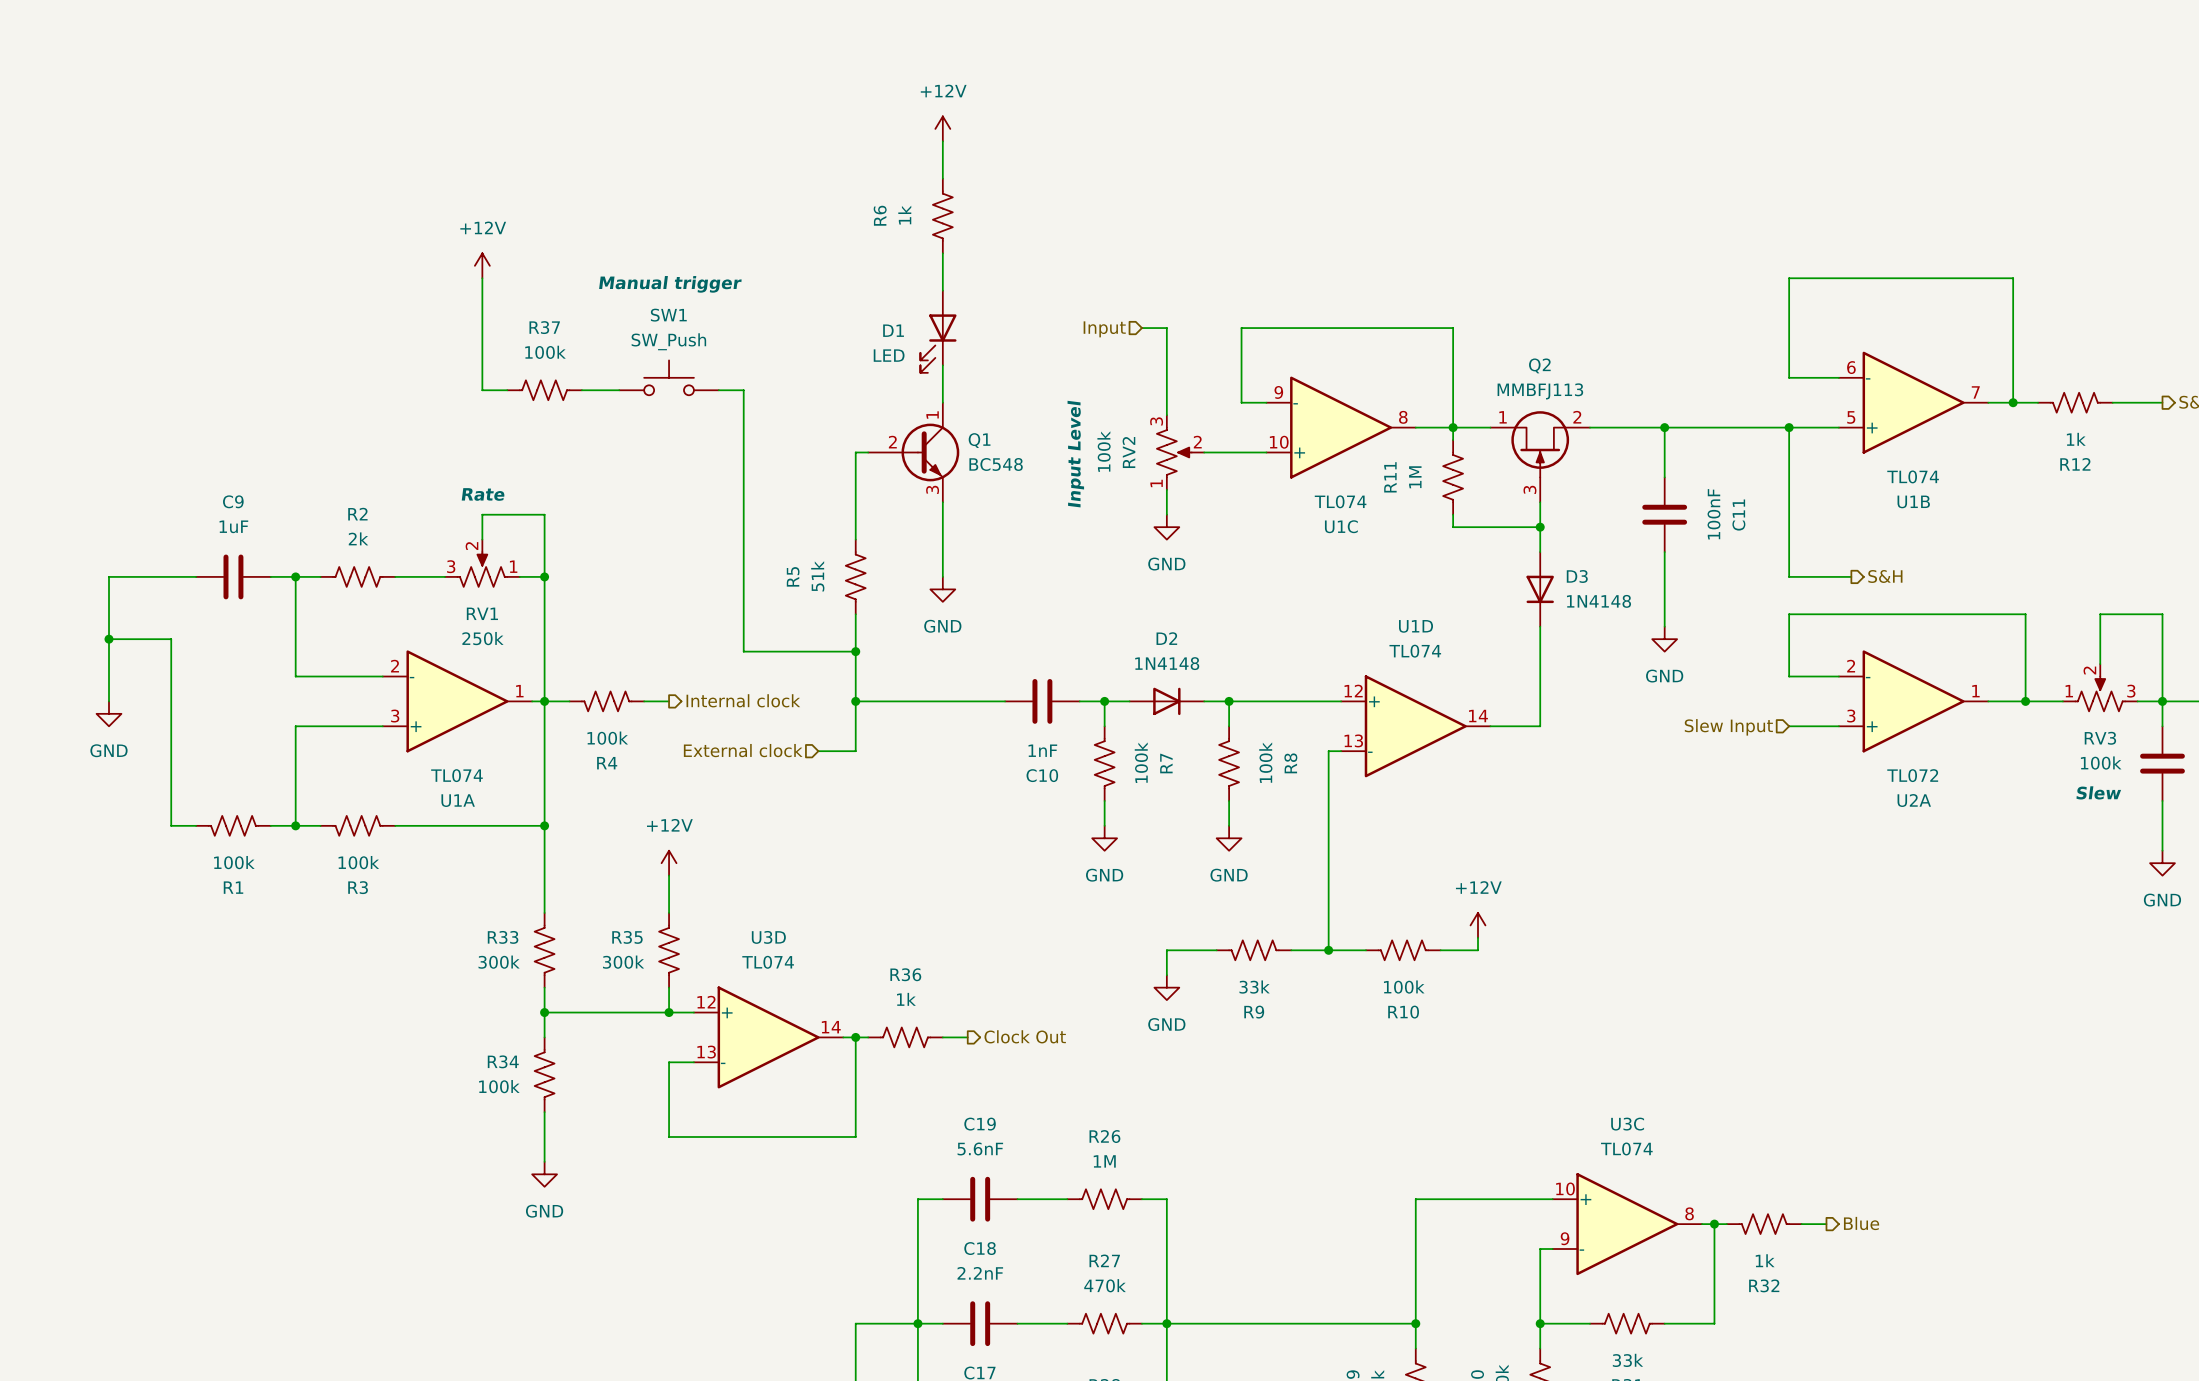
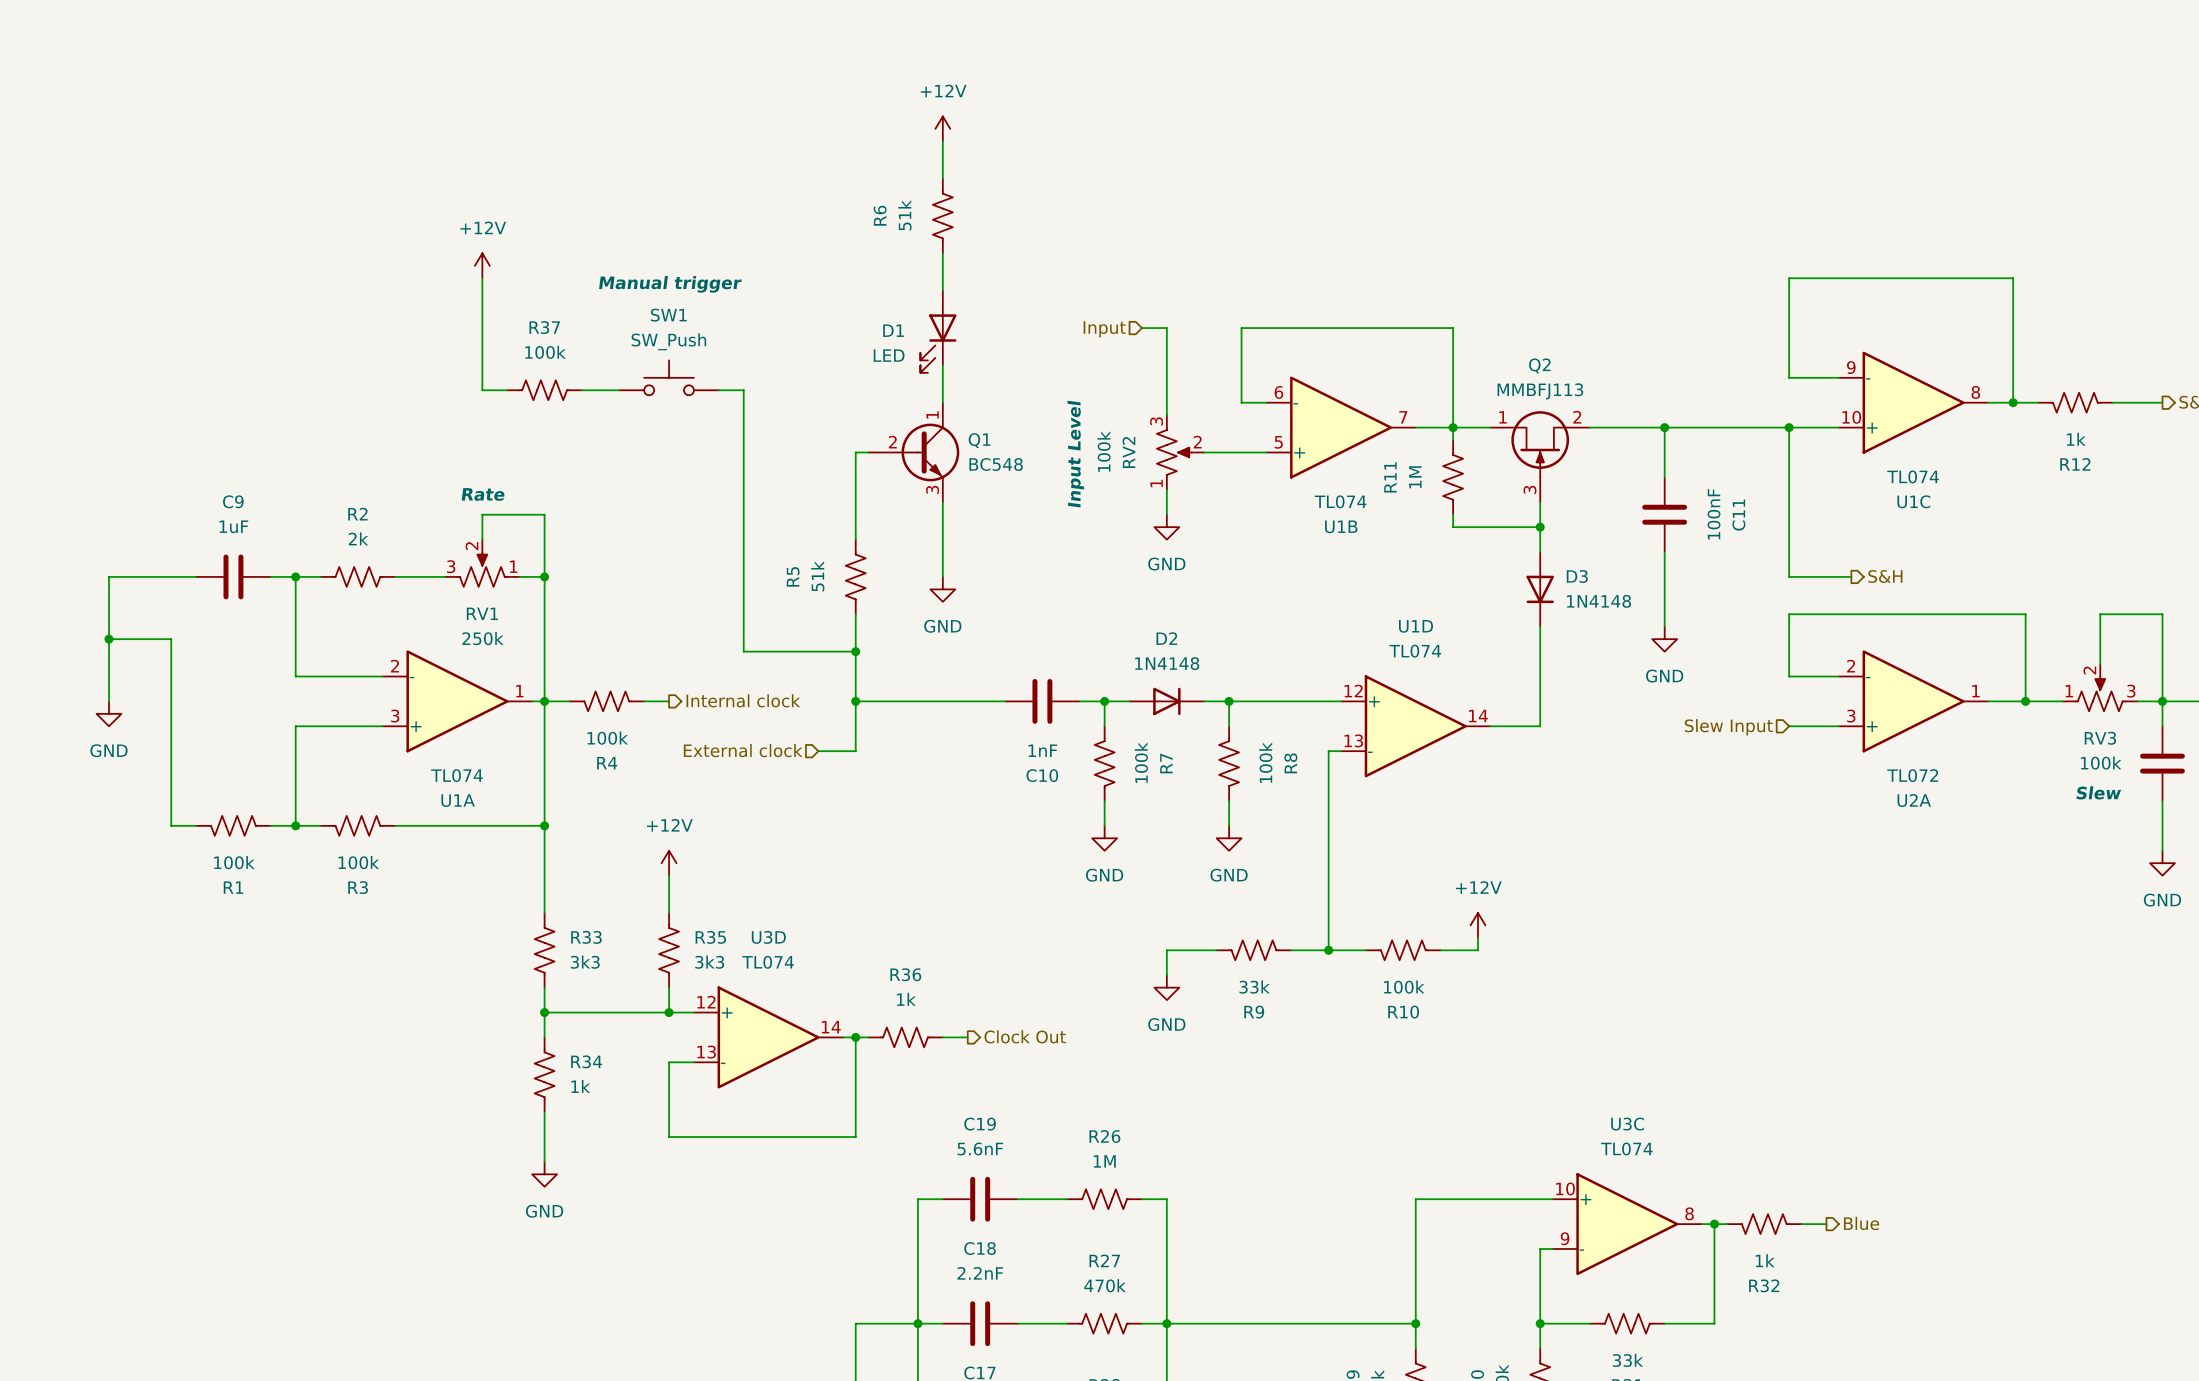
R6 value: 1k (904, 215) -> 51k (904, 215)
U1B position: (1913, 402) -> (1341, 427)
U1C position: (1341, 427) -> (1913, 402)
R33 flip: as is (544, 950) -> left-right (544, 950)
R35 flip: as is (669, 950) -> left-right (669, 950)
R33 value: 300k (499, 962) -> 3k3 (585, 962)
R35 value: 300k (623, 962) -> 3k3 (709, 962)
R34 flip: as is (544, 1074) -> left-right (544, 1074)
R34 value: 100k (499, 1086) -> 1k (580, 1086)

